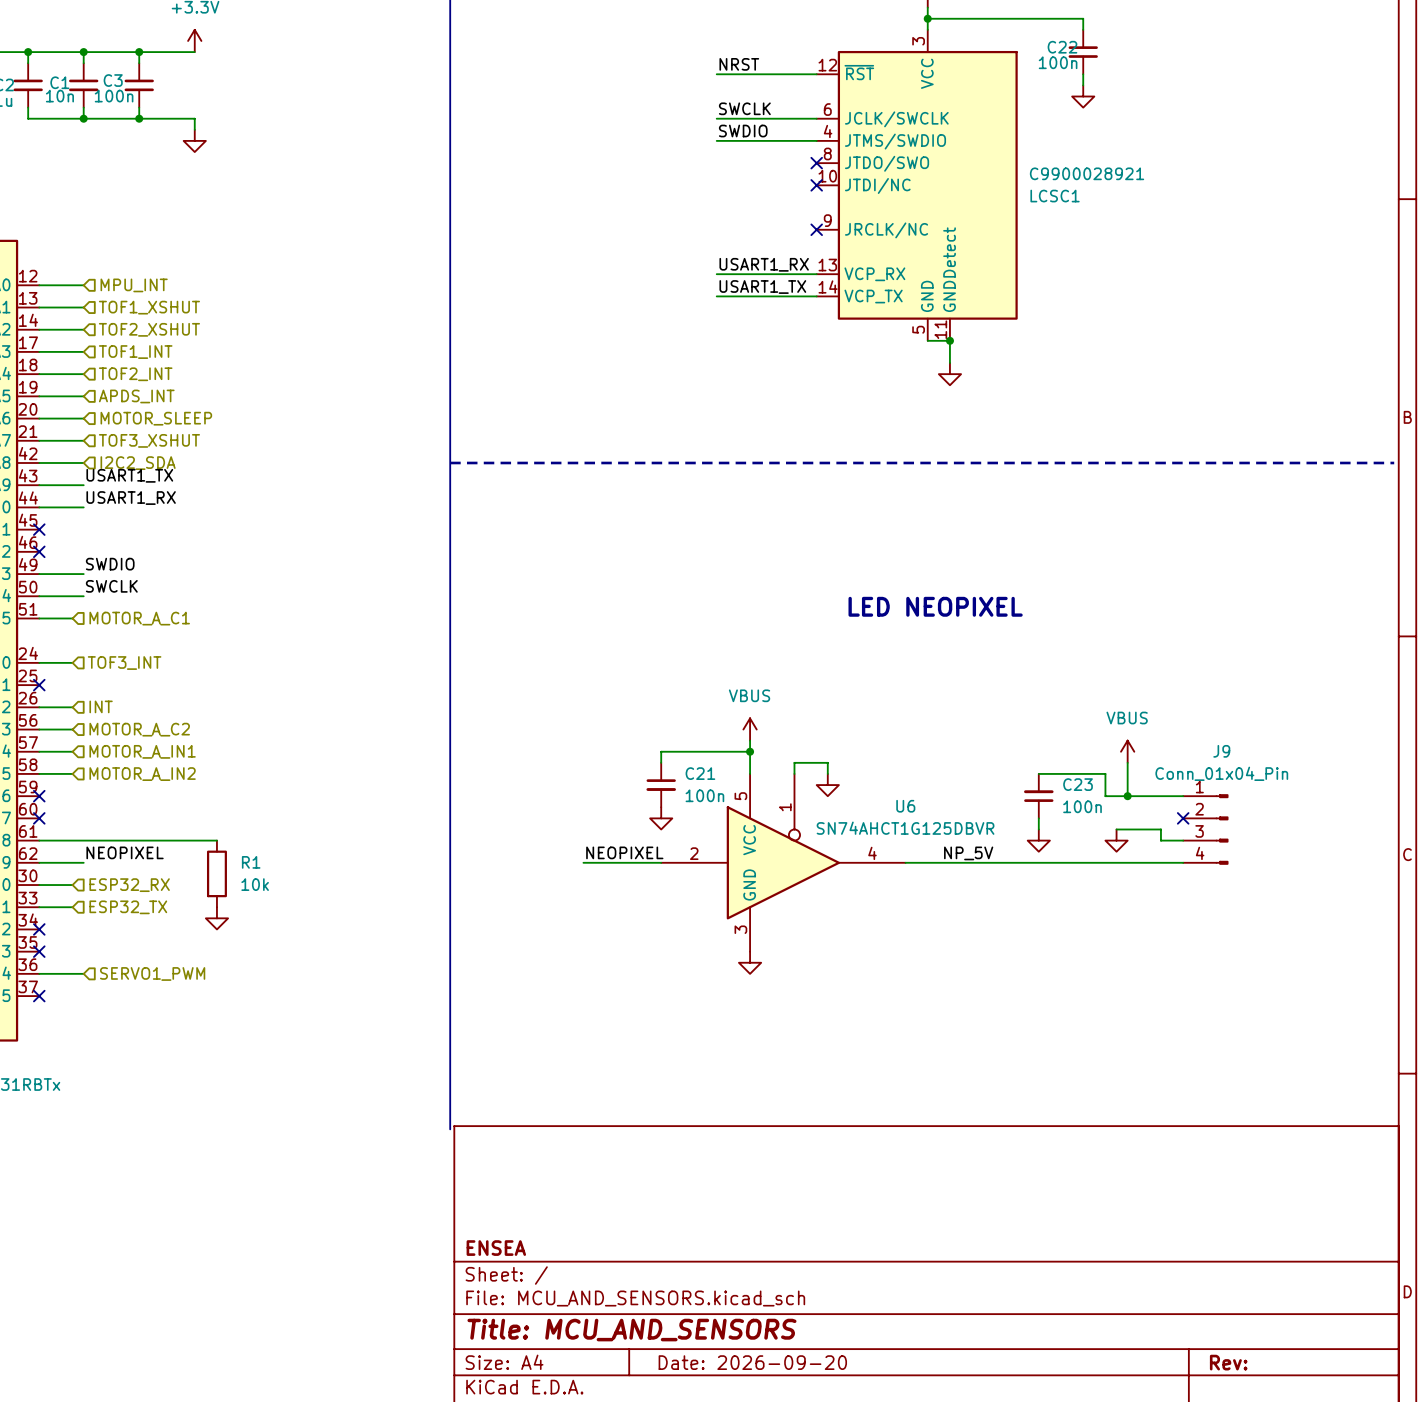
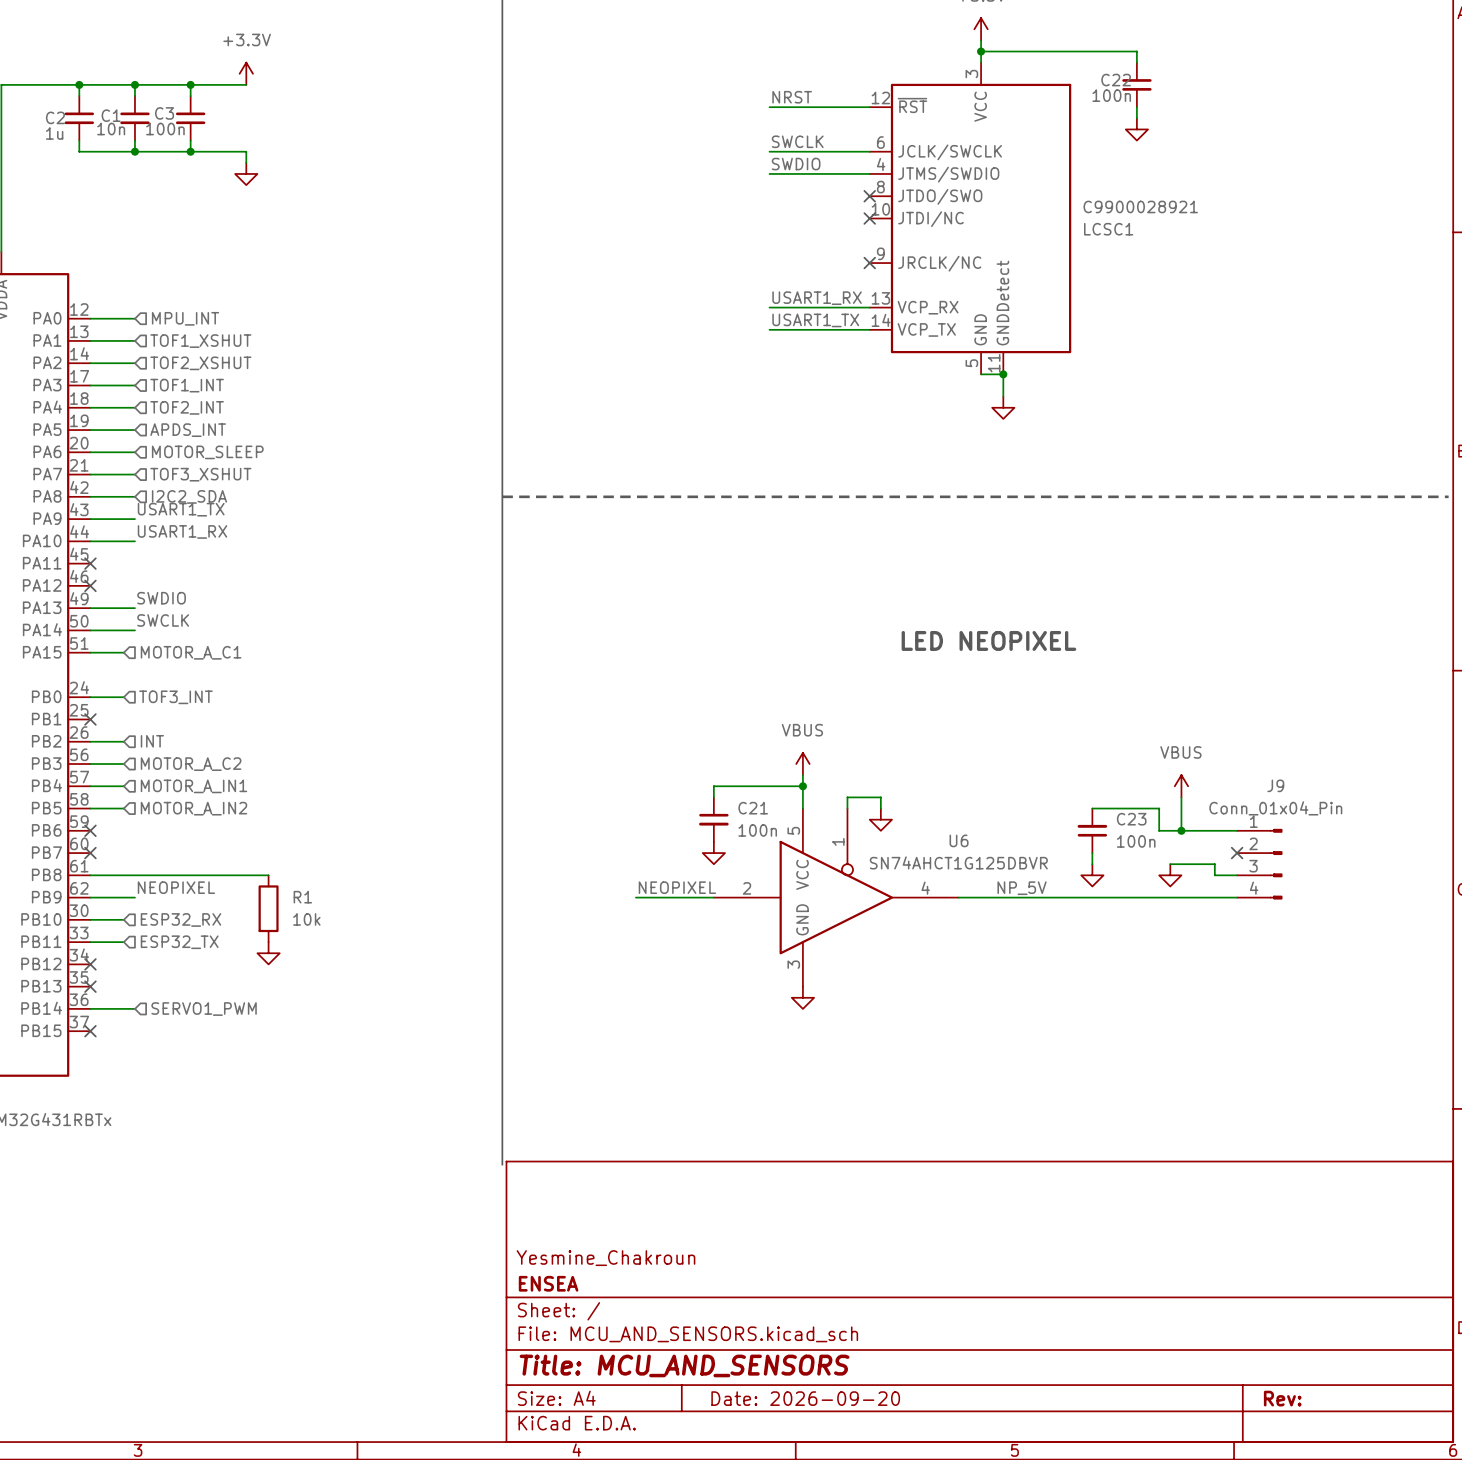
title block: none -> Yesmine_Chakroun (605, 1258)

